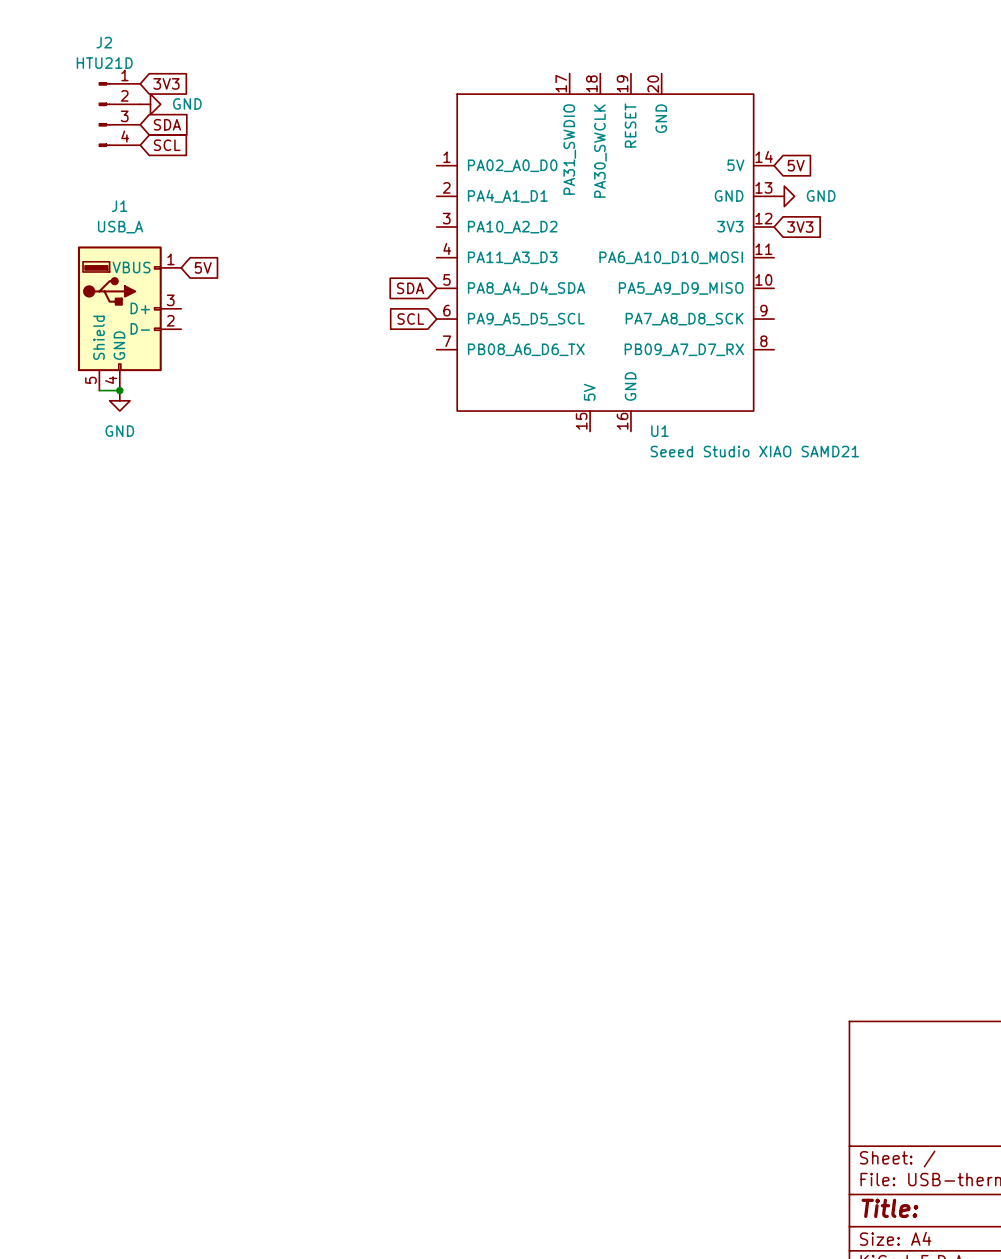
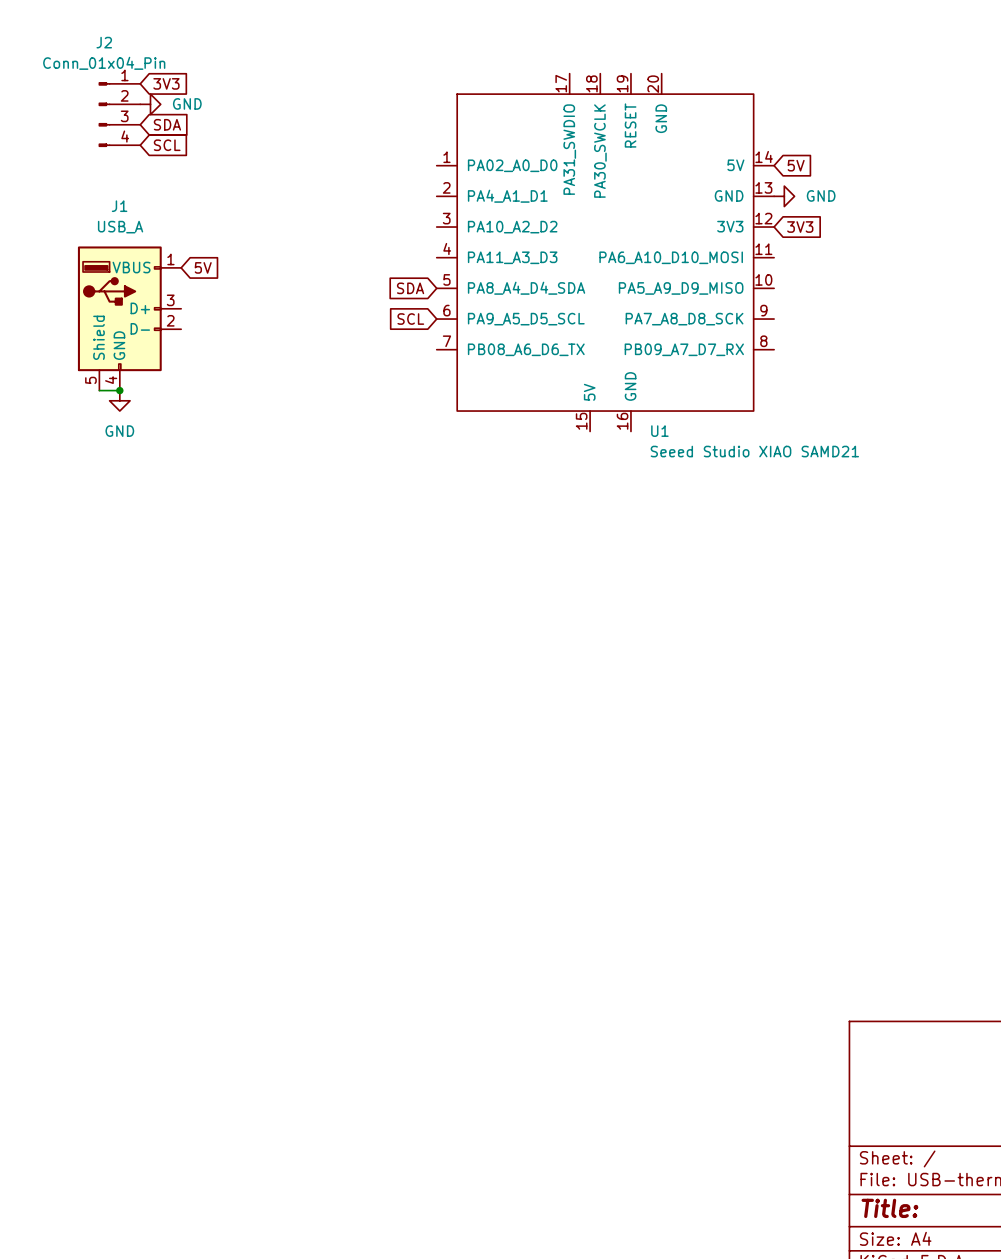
J2 value: HTU21D (104, 63) -> Conn_01x04_Pin (104, 63)

